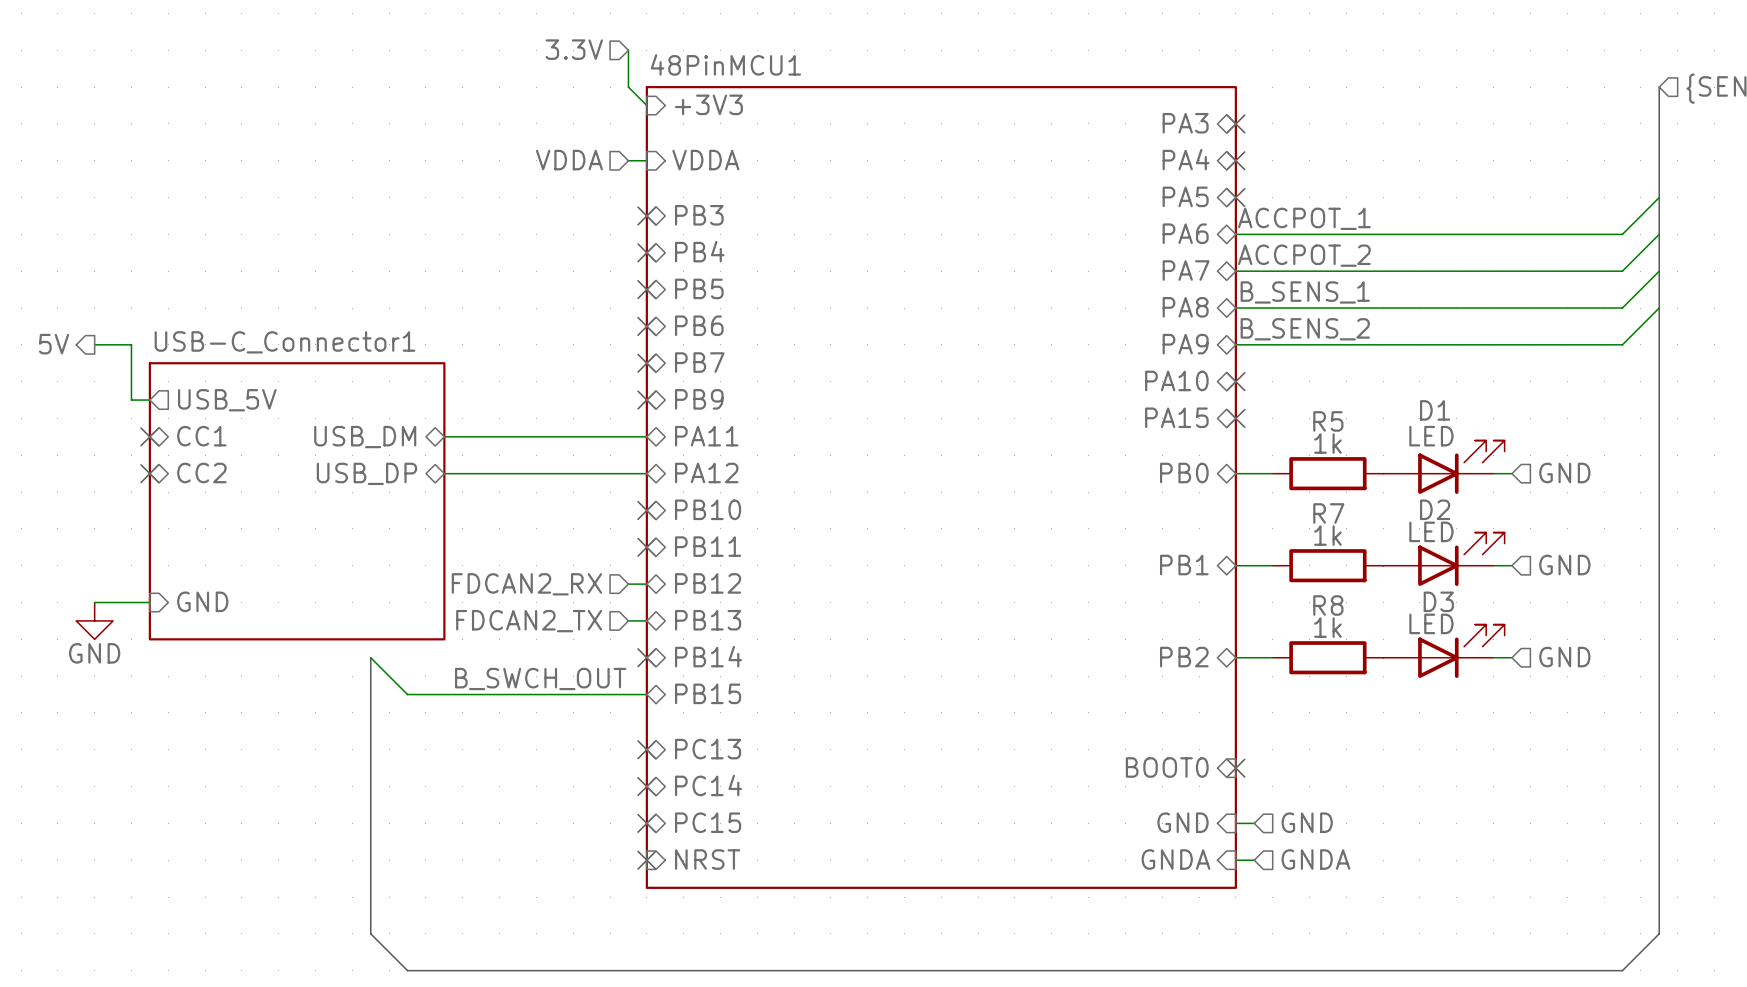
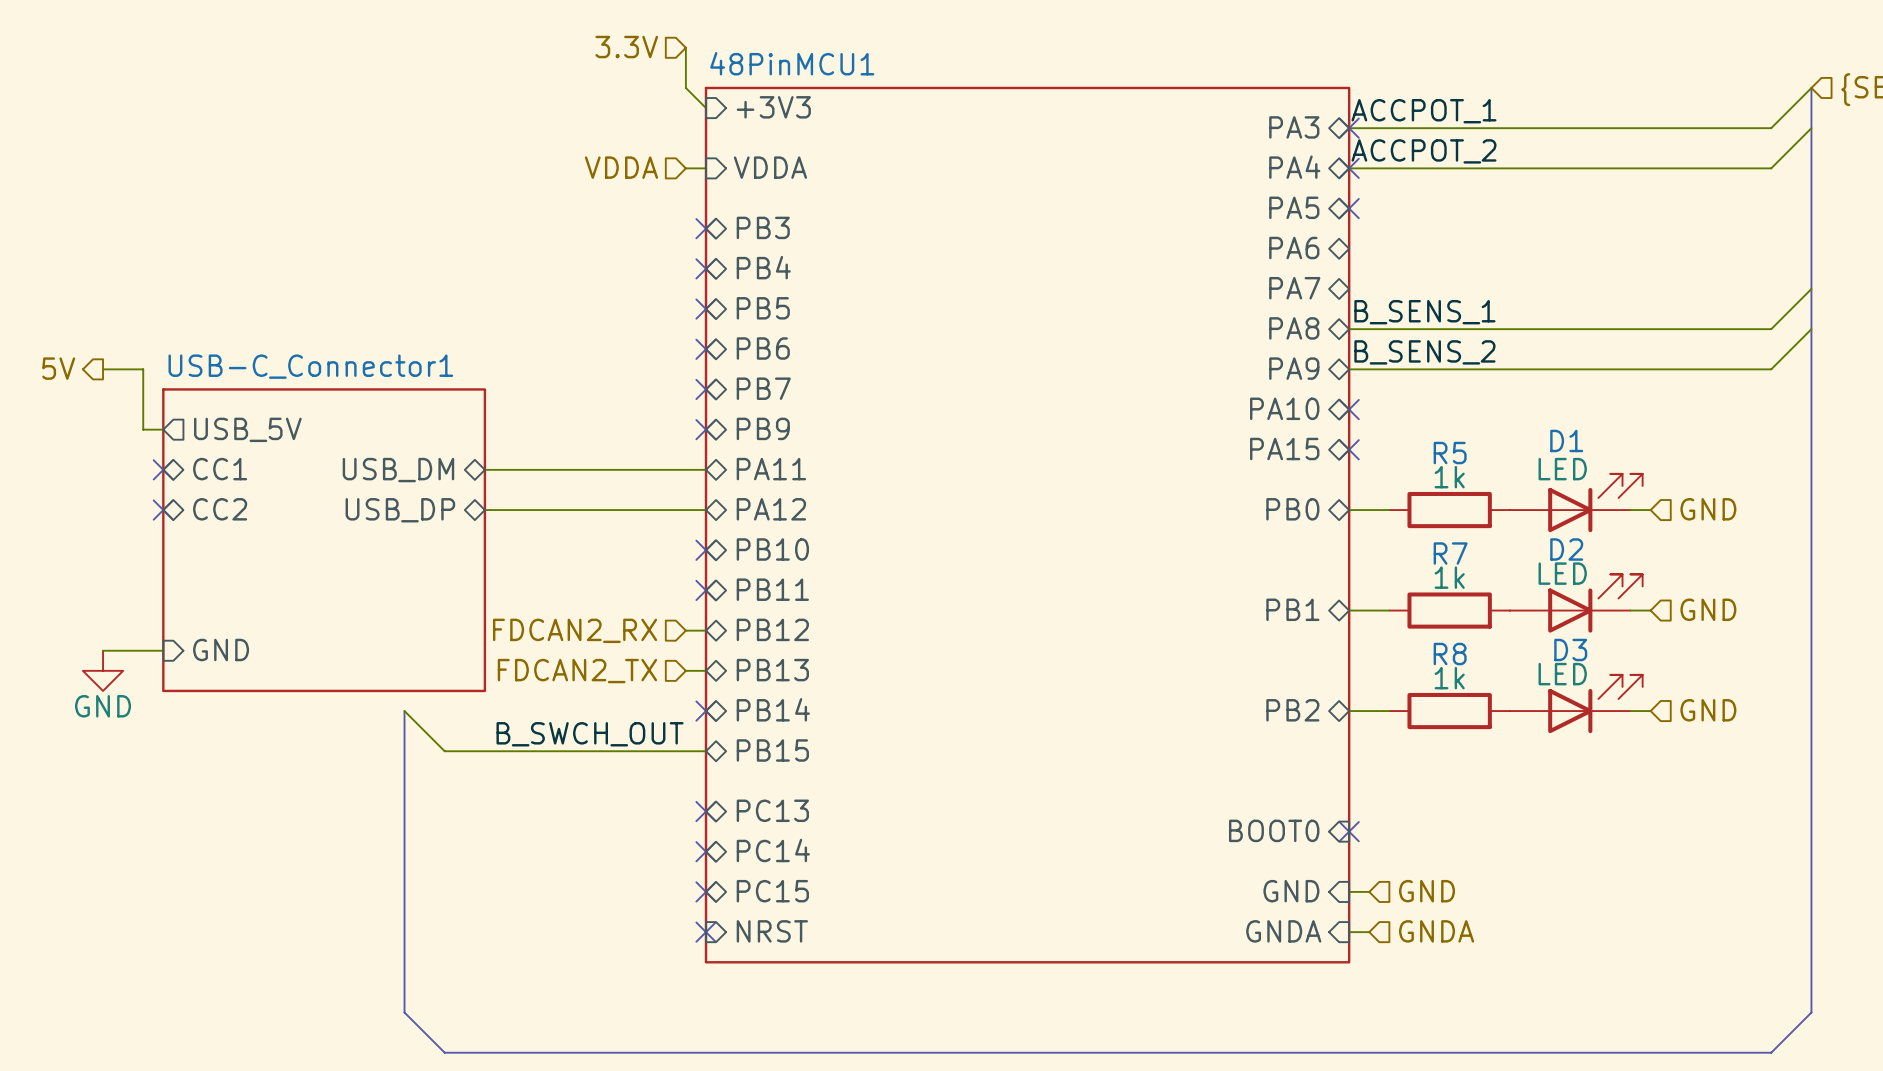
wire: (1659, 197) (1622, 234) (1235, 234) -> (1811, 87) (1771, 128) (1349, 128)
label position: ACCPOT_1 (1304, 218) -> ACCPOT_1 (1423, 111)
wire: (1659, 234) (1622, 271) (1235, 271) -> (1811, 128) (1771, 168) (1349, 168)
label position: ACCPOT_2 (1304, 255) -> ACCPOT_2 (1423, 151)

